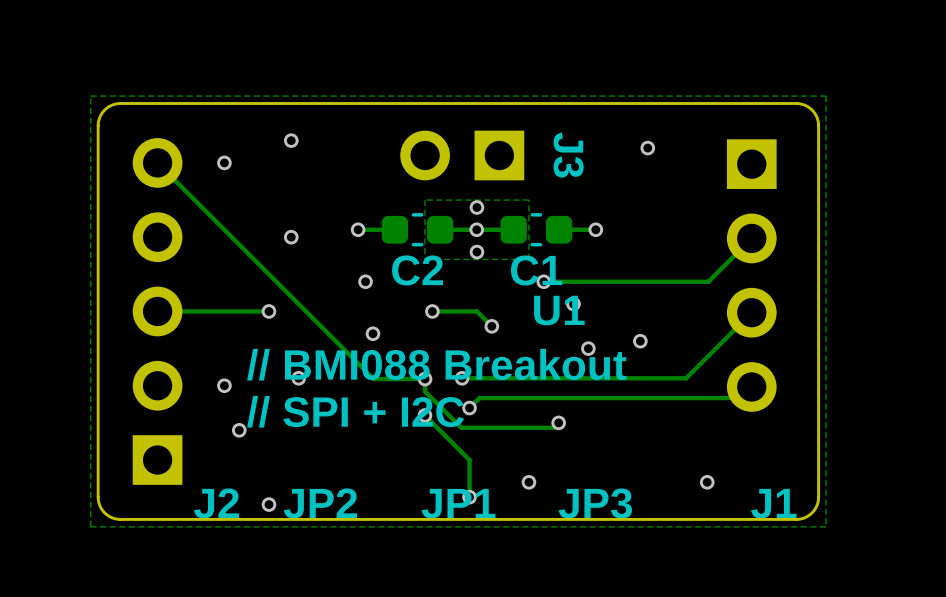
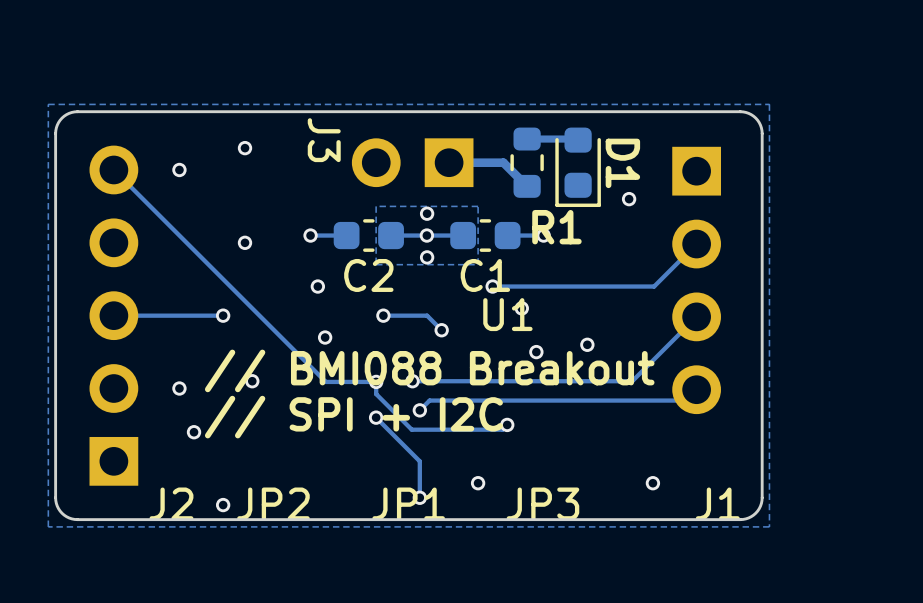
track: none -> (527, 139) (578, 140)
via position: (647, 148) -> (629, 199)
track: none -> (449, 162) (503, 162) (527, 186)
J3 name position: J3 (568, 155) -> J3 (324, 140)
R1: none -> (527, 162)
D1: none -> (578, 167)

